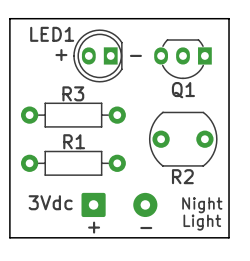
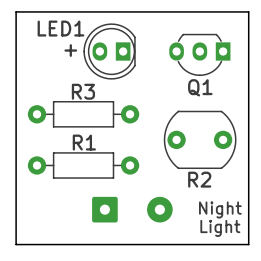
text: - (135, 55) -> none
text: 3Vdc (50, 202) -> none
text: + (94, 227) -> none
text: - (146, 228) -> none

